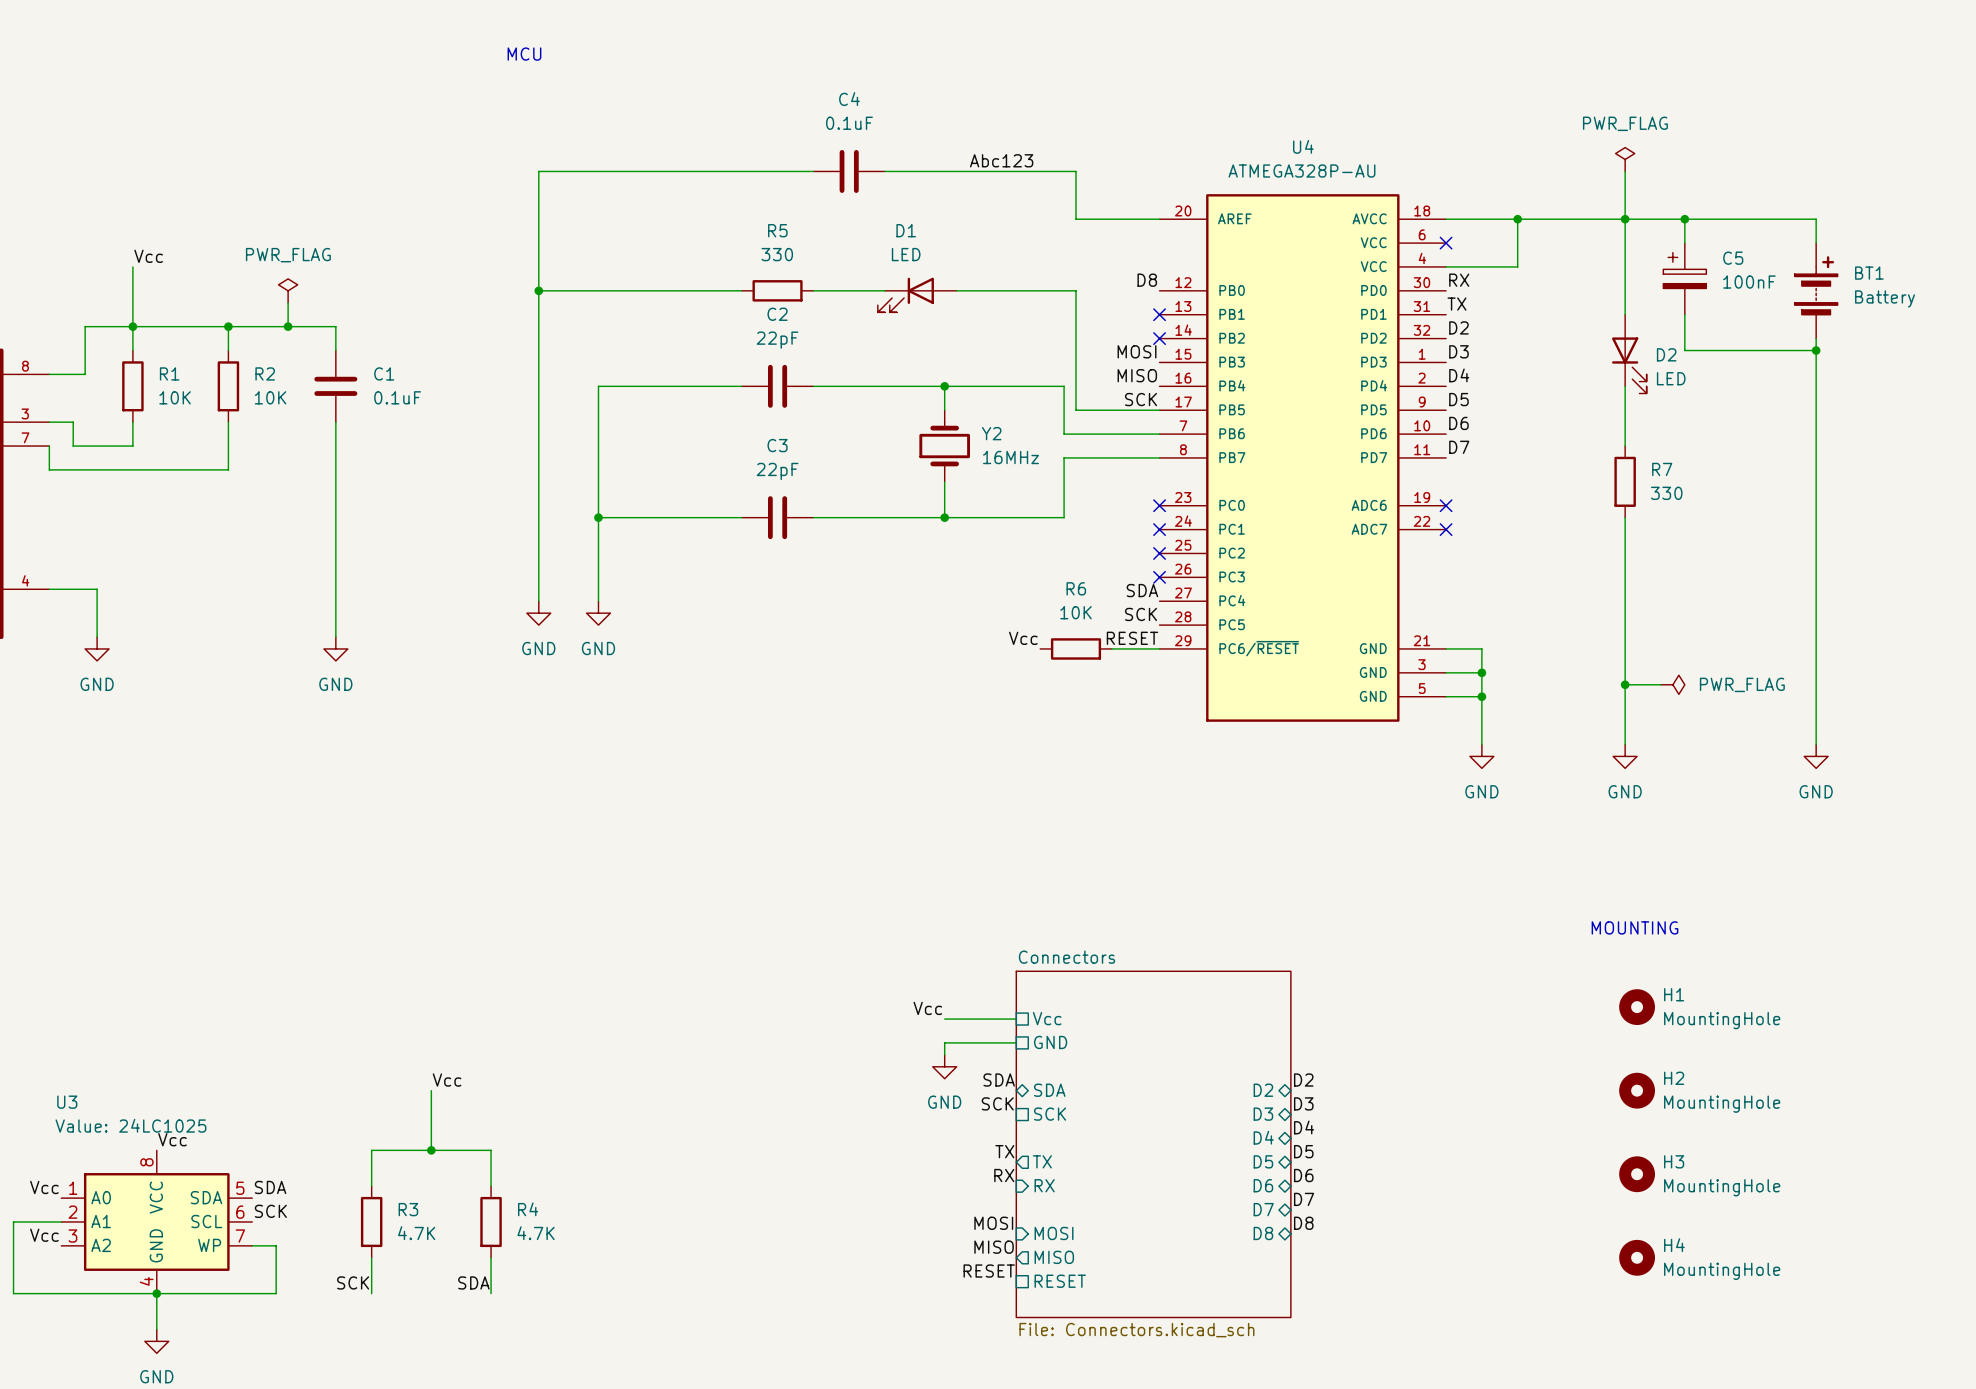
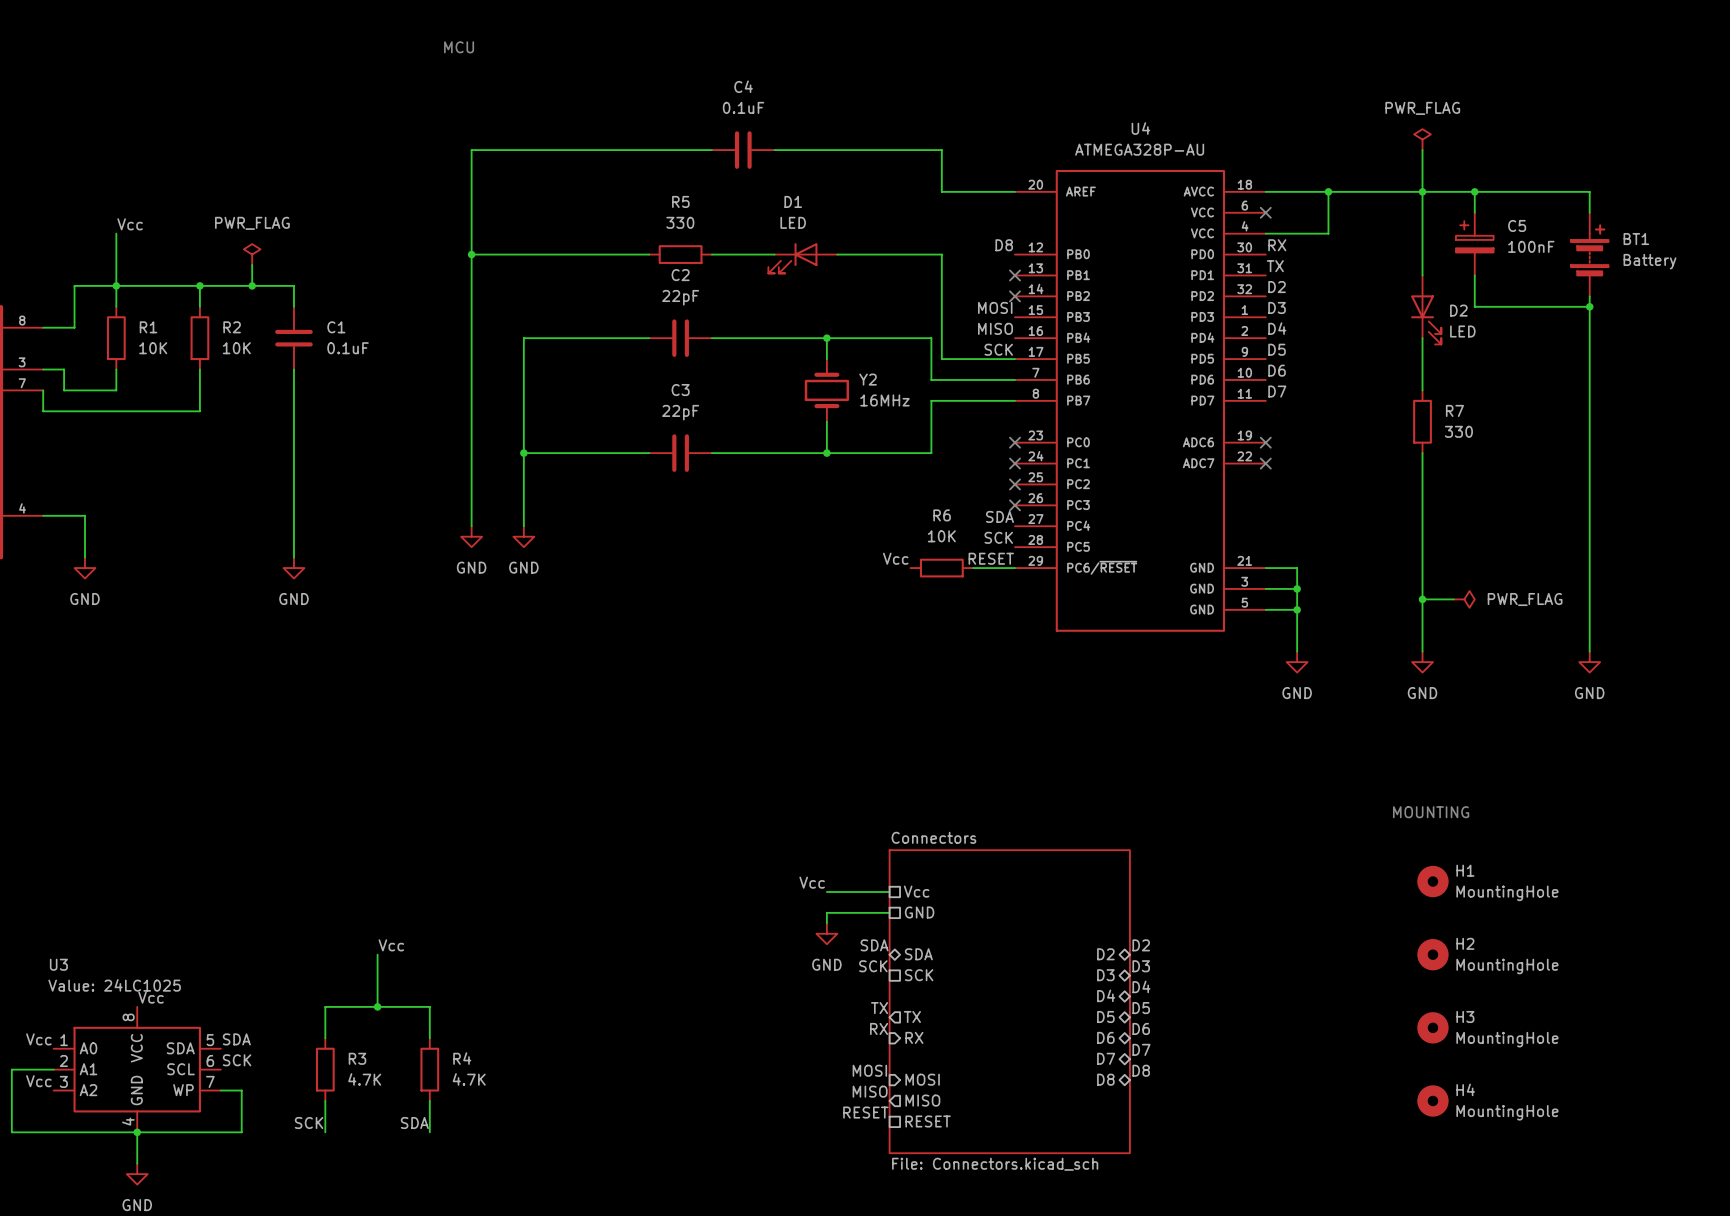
label: Abc123 (1001, 160) -> none

